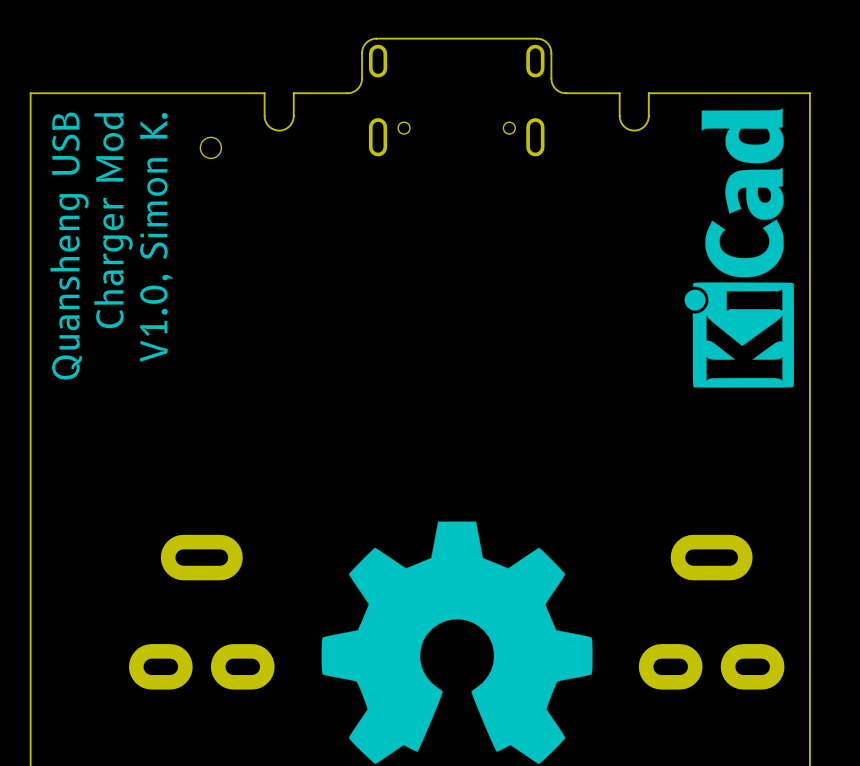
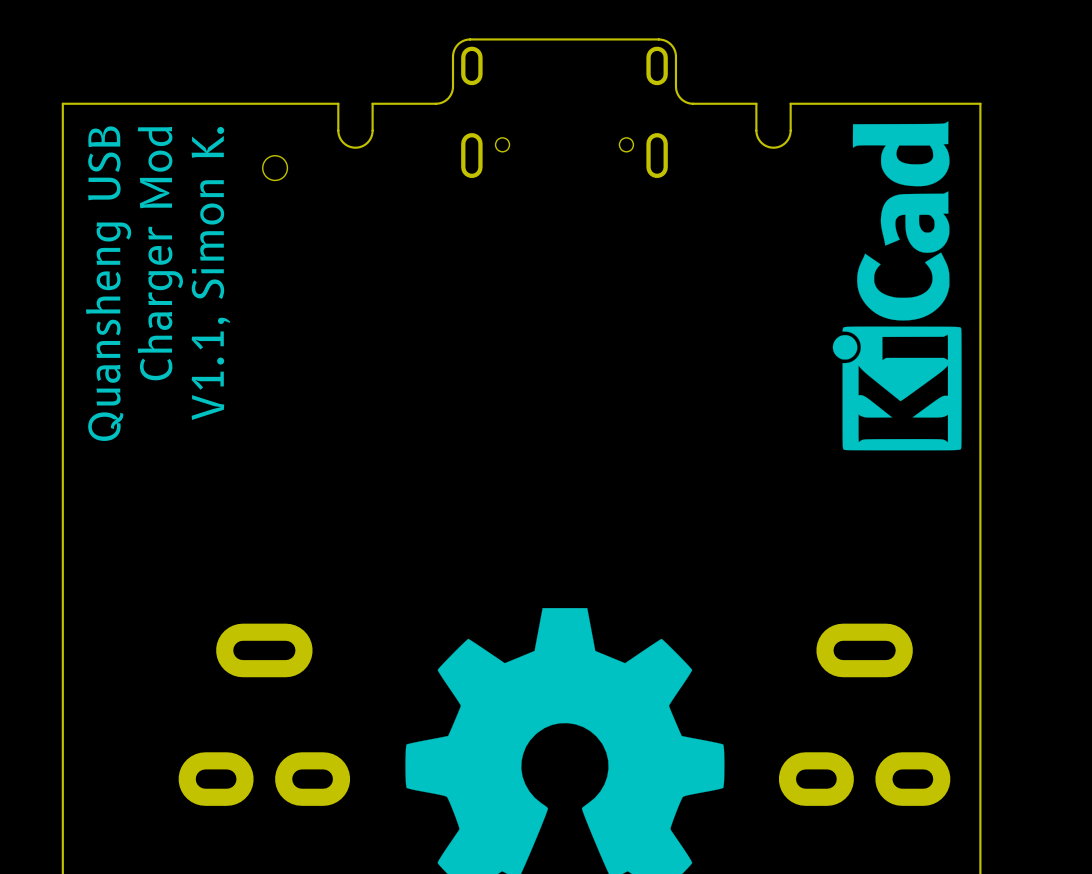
text: V1.0, Simon K. (156, 237) -> V1.1, Simon K. (210, 273)

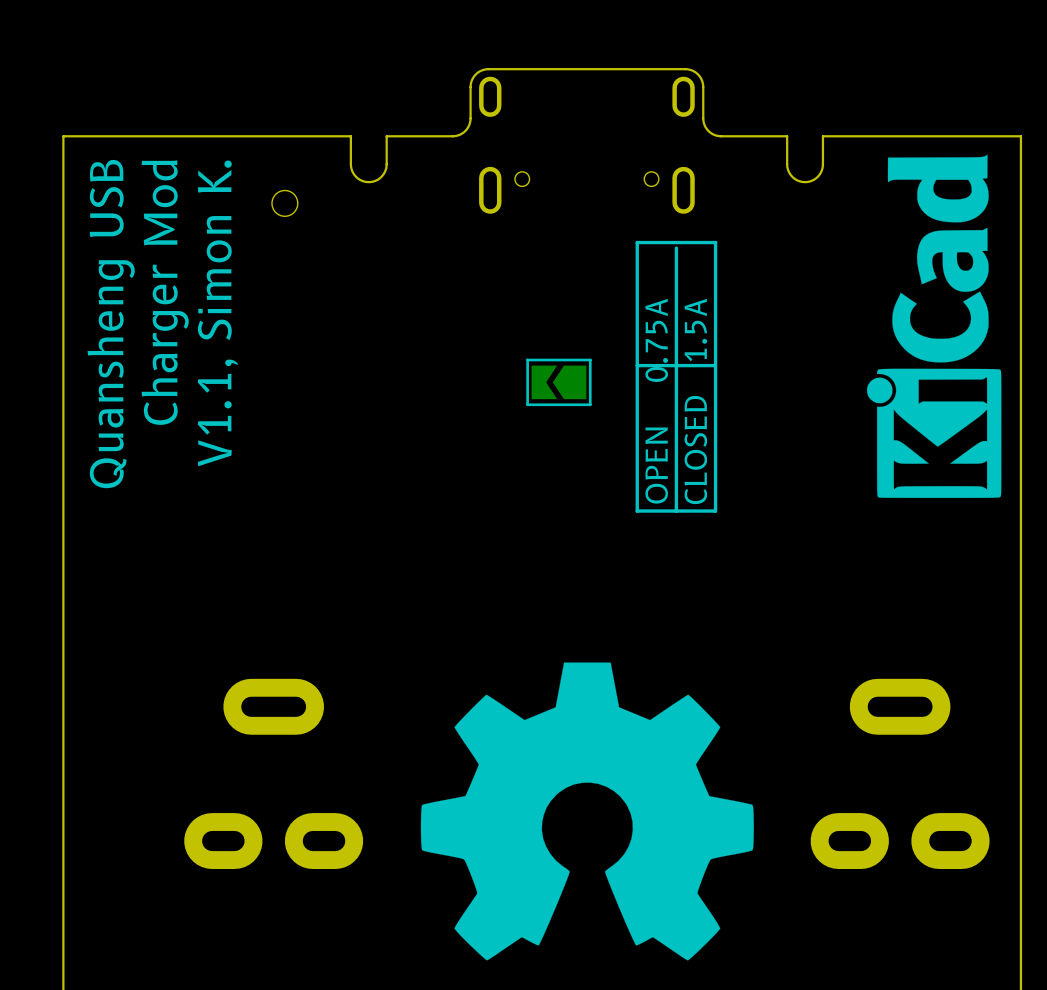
line: none -> (715, 242) (637, 242) (637, 511) (715, 511) (715, 242)
line: none -> (676, 248) (676, 511)
line: none -> (715, 365) (637, 365)
part: none -> (558, 382)
text: none -> OPEN 0.75A (656, 401)
text: none -> CLOSED 1.5A (695, 401)

